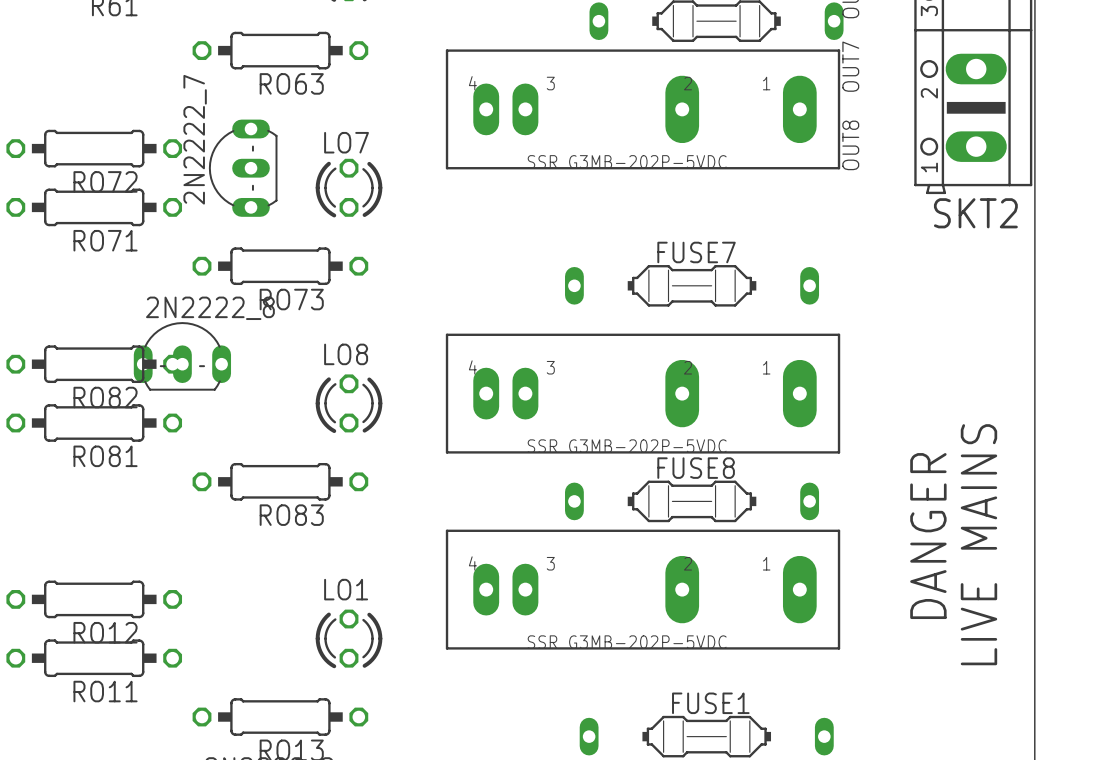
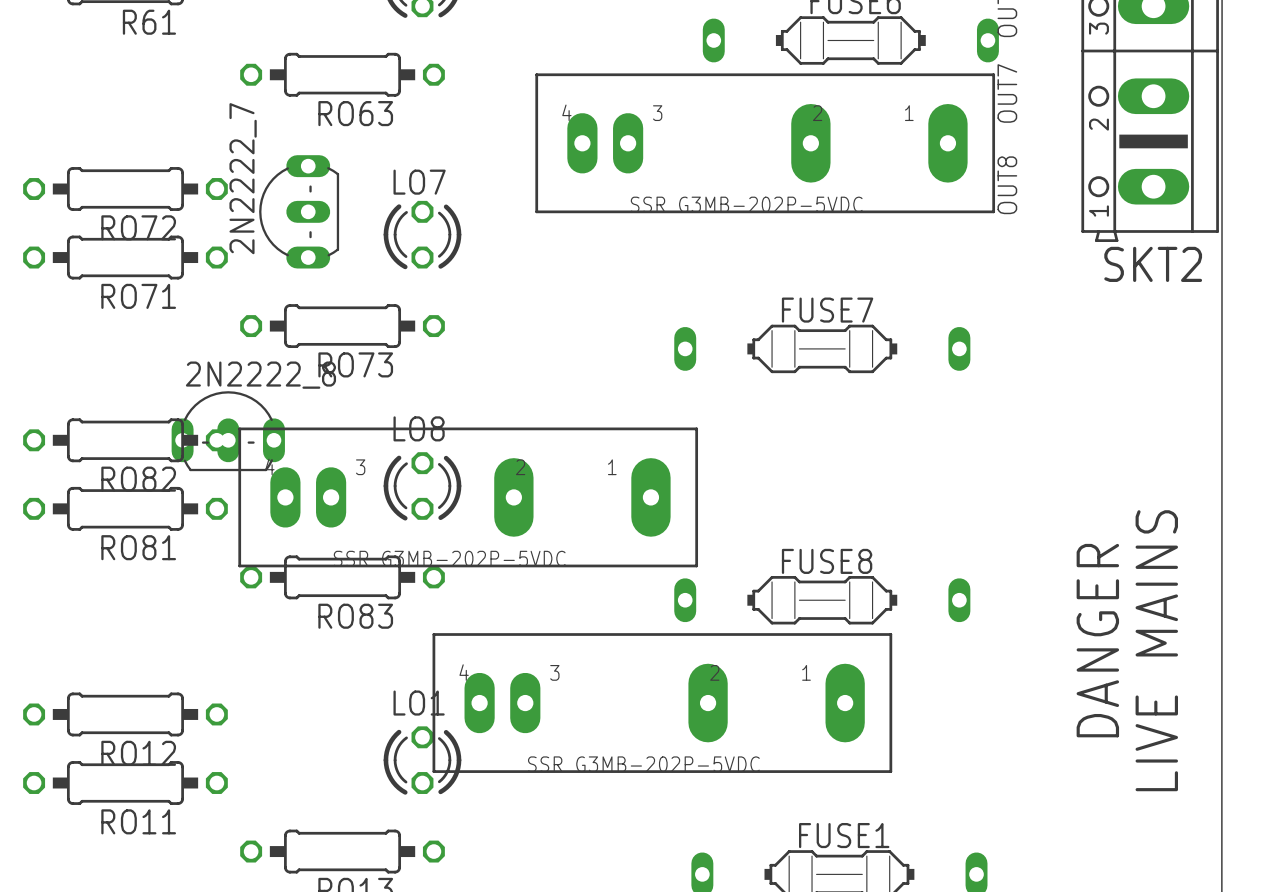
part: (643, 393) -> none
part: none -> (468, 497)
part position: (643, 589) -> (662, 703)

